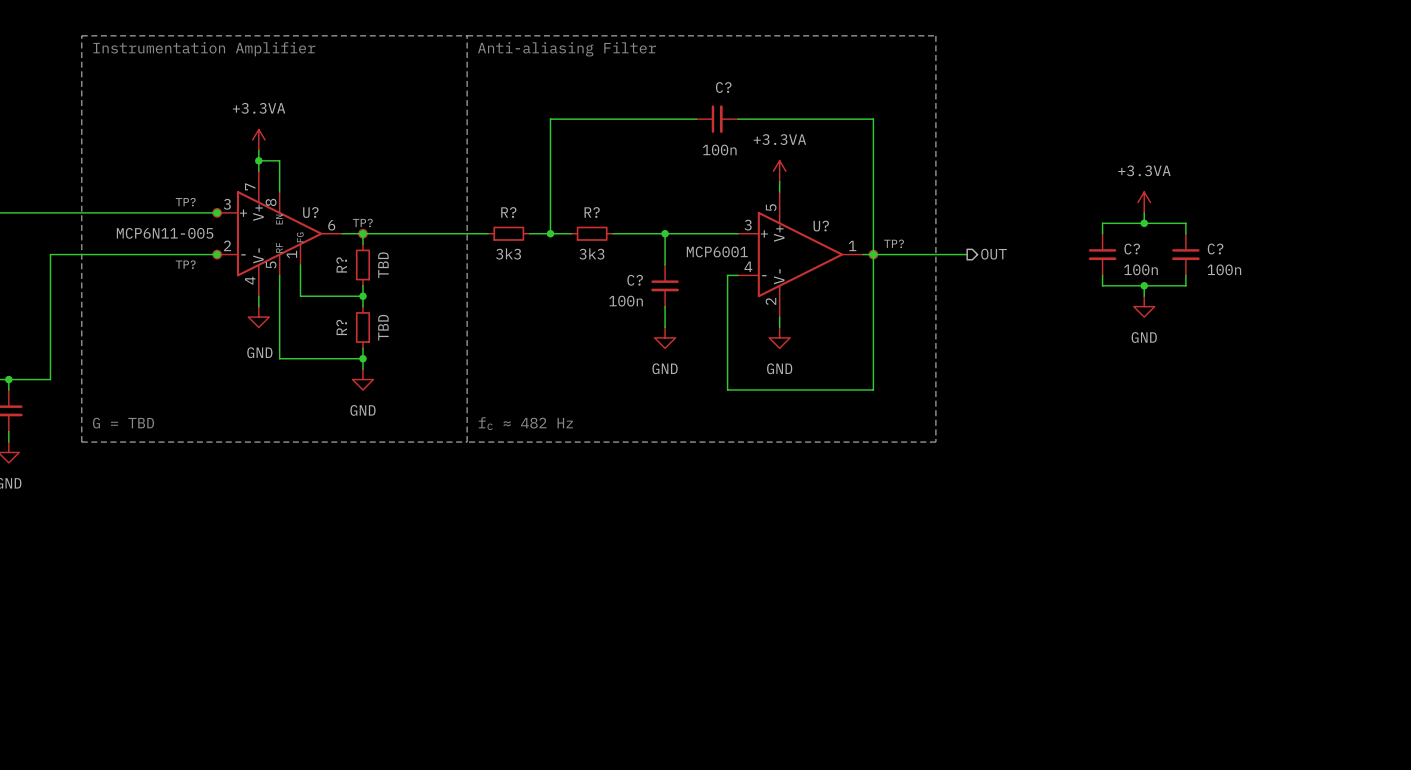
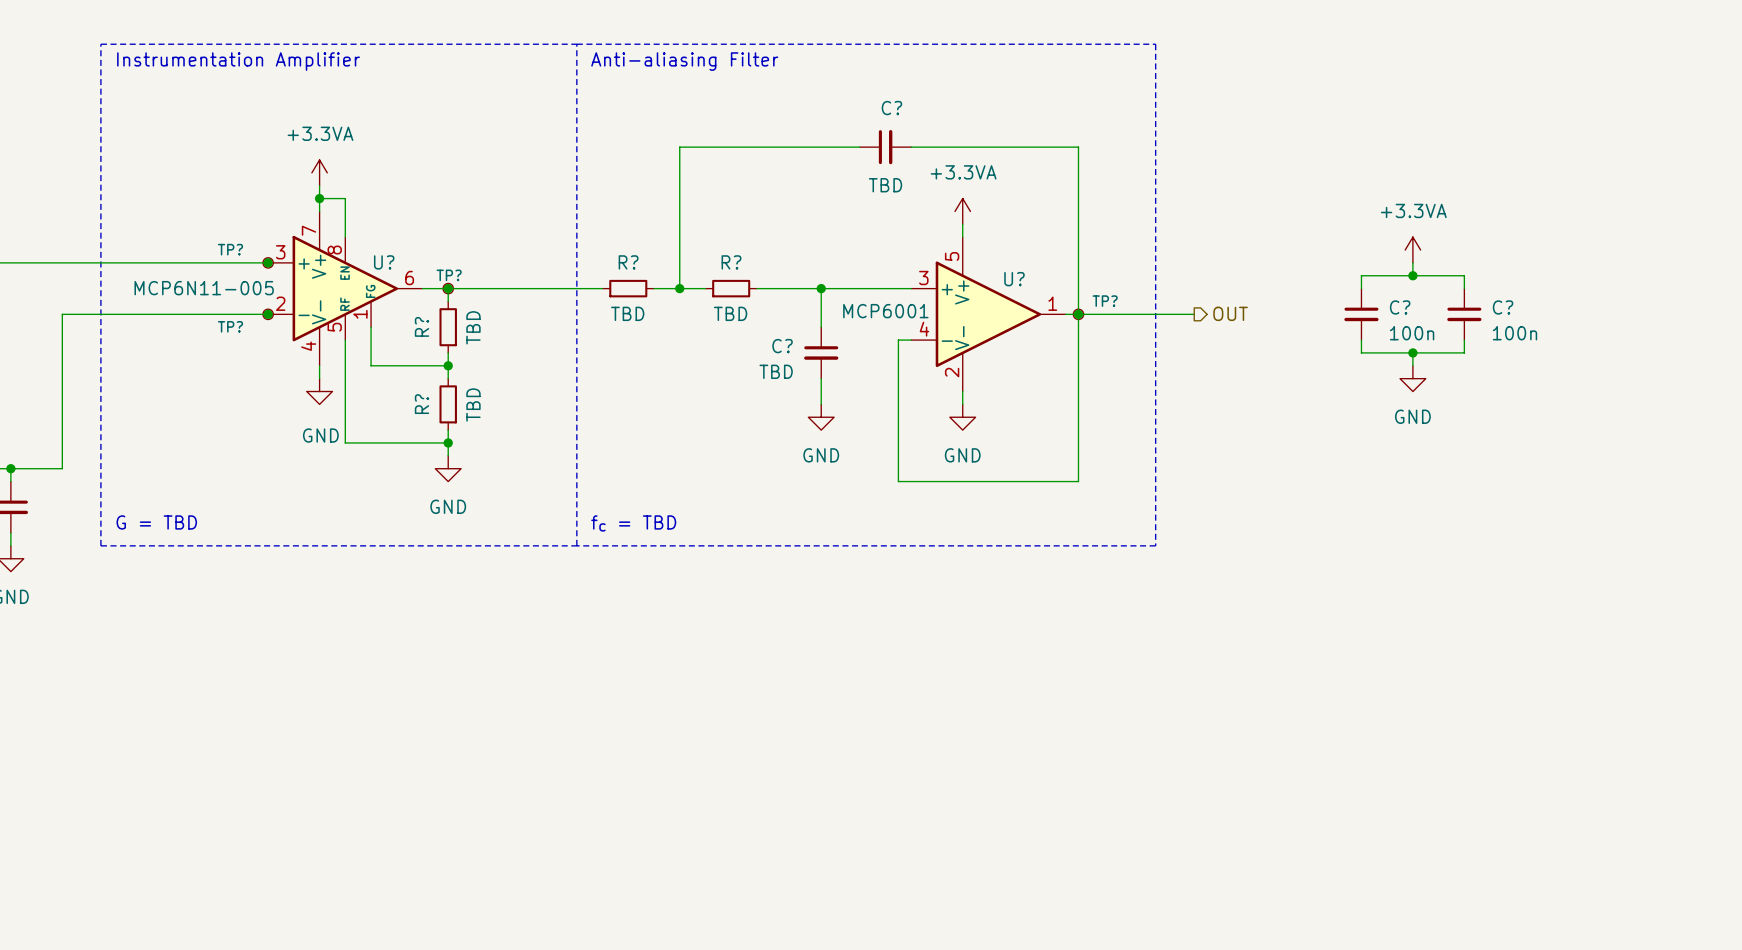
C? value: 100n (719, 150) -> TBD (885, 185)
R? value: 3k3 (508, 253) -> TBD (627, 313)
R? value: 3k3 (591, 253) -> TBD (730, 313)
C? value: 100n (626, 301) -> TBD (776, 371)
text: fc ≈ 482 Hz (525, 423) -> fc = TBD (633, 523)

